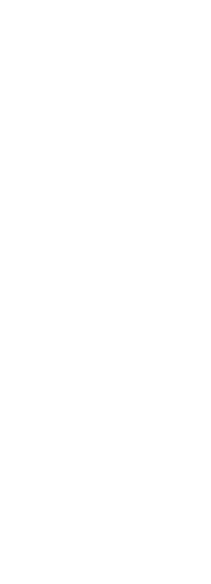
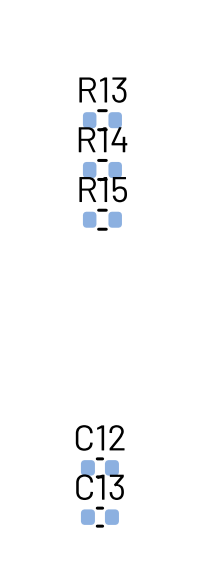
R13: none -> (102, 120)
R14: none -> (102, 169)
R15: none -> (102, 219)
C12: none -> (99, 467)
C13: none -> (99, 517)

